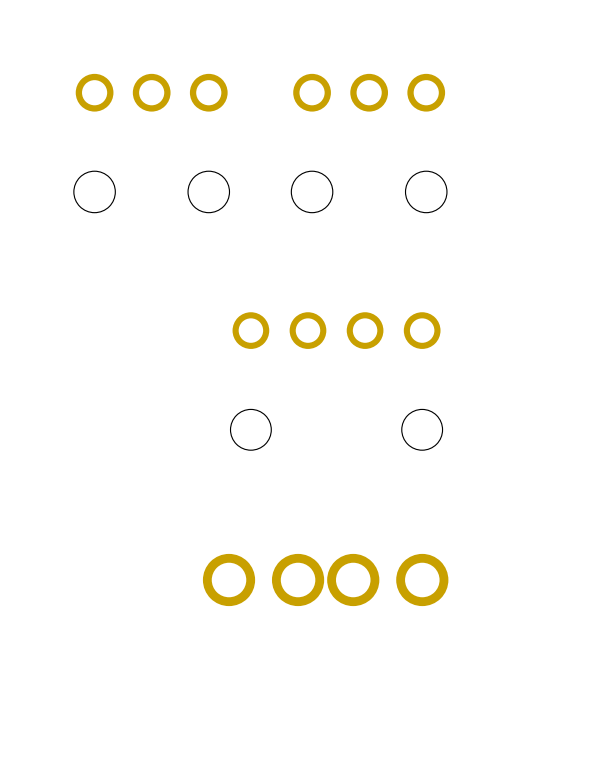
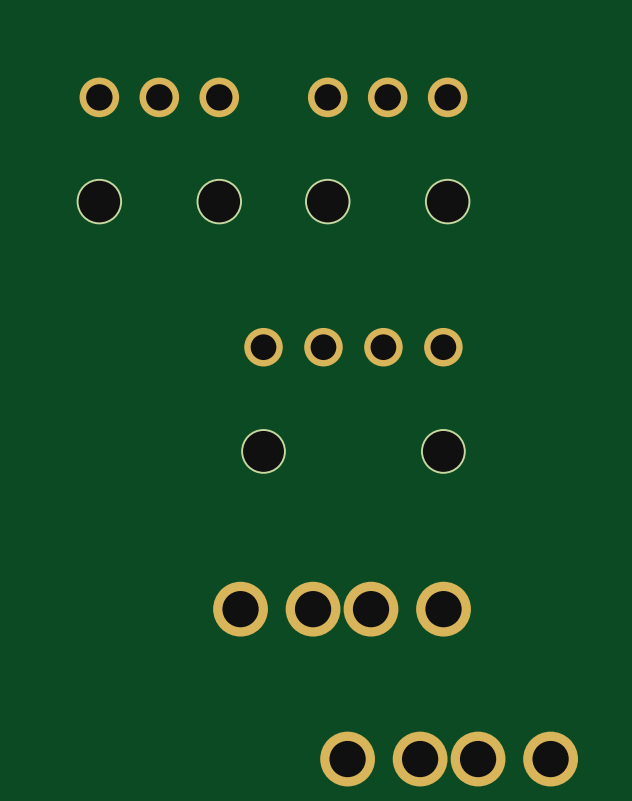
part: none -> (449, 759)

